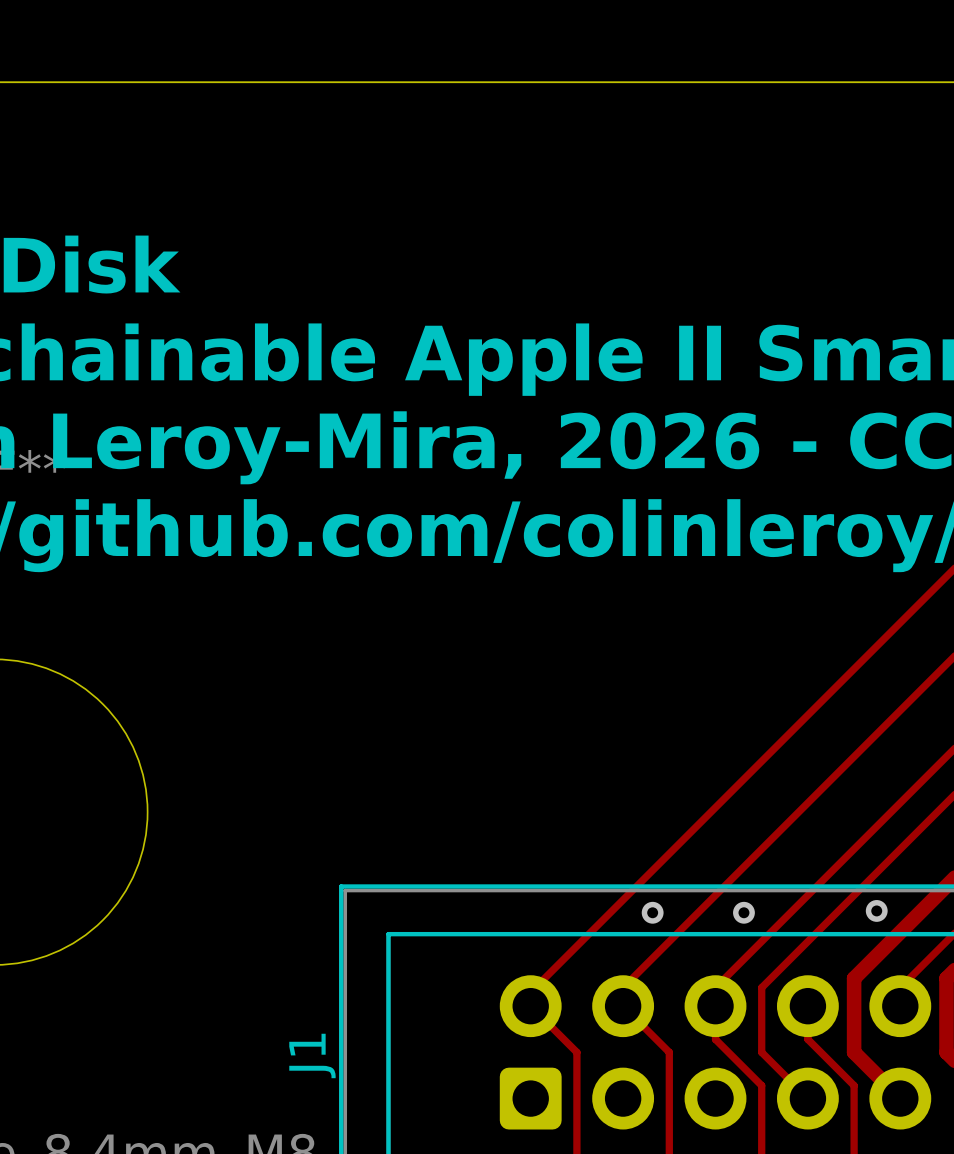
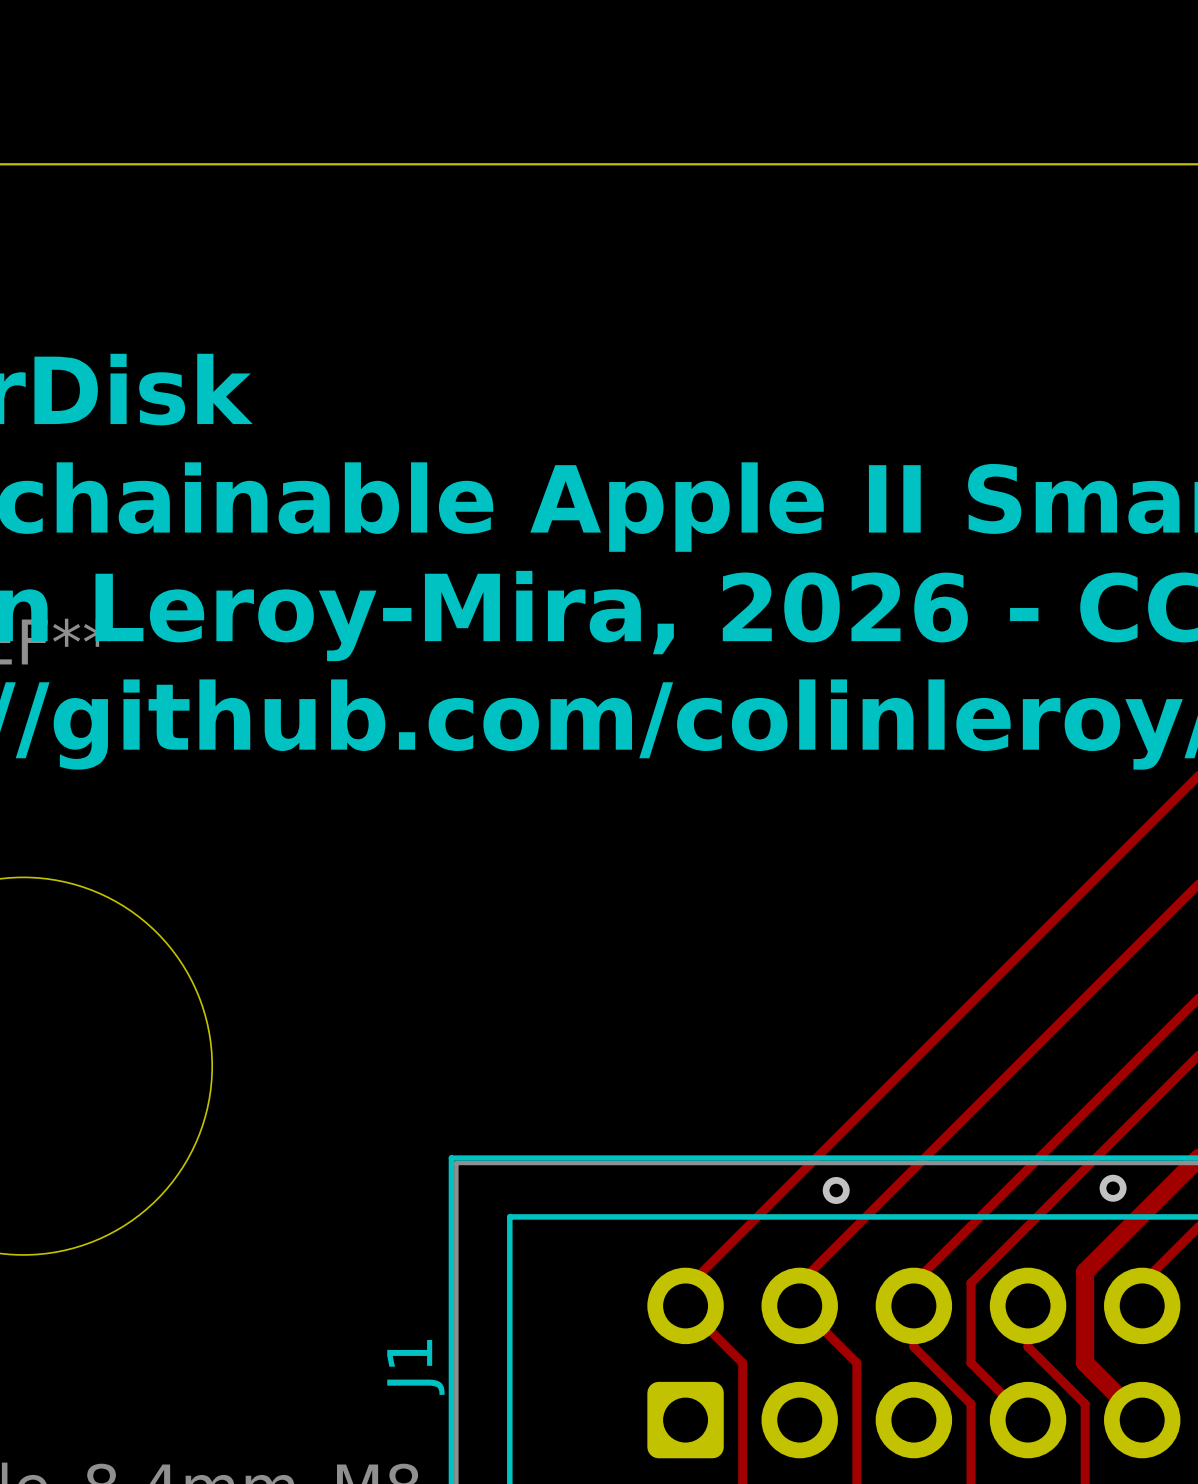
via: (743, 912) -> none

